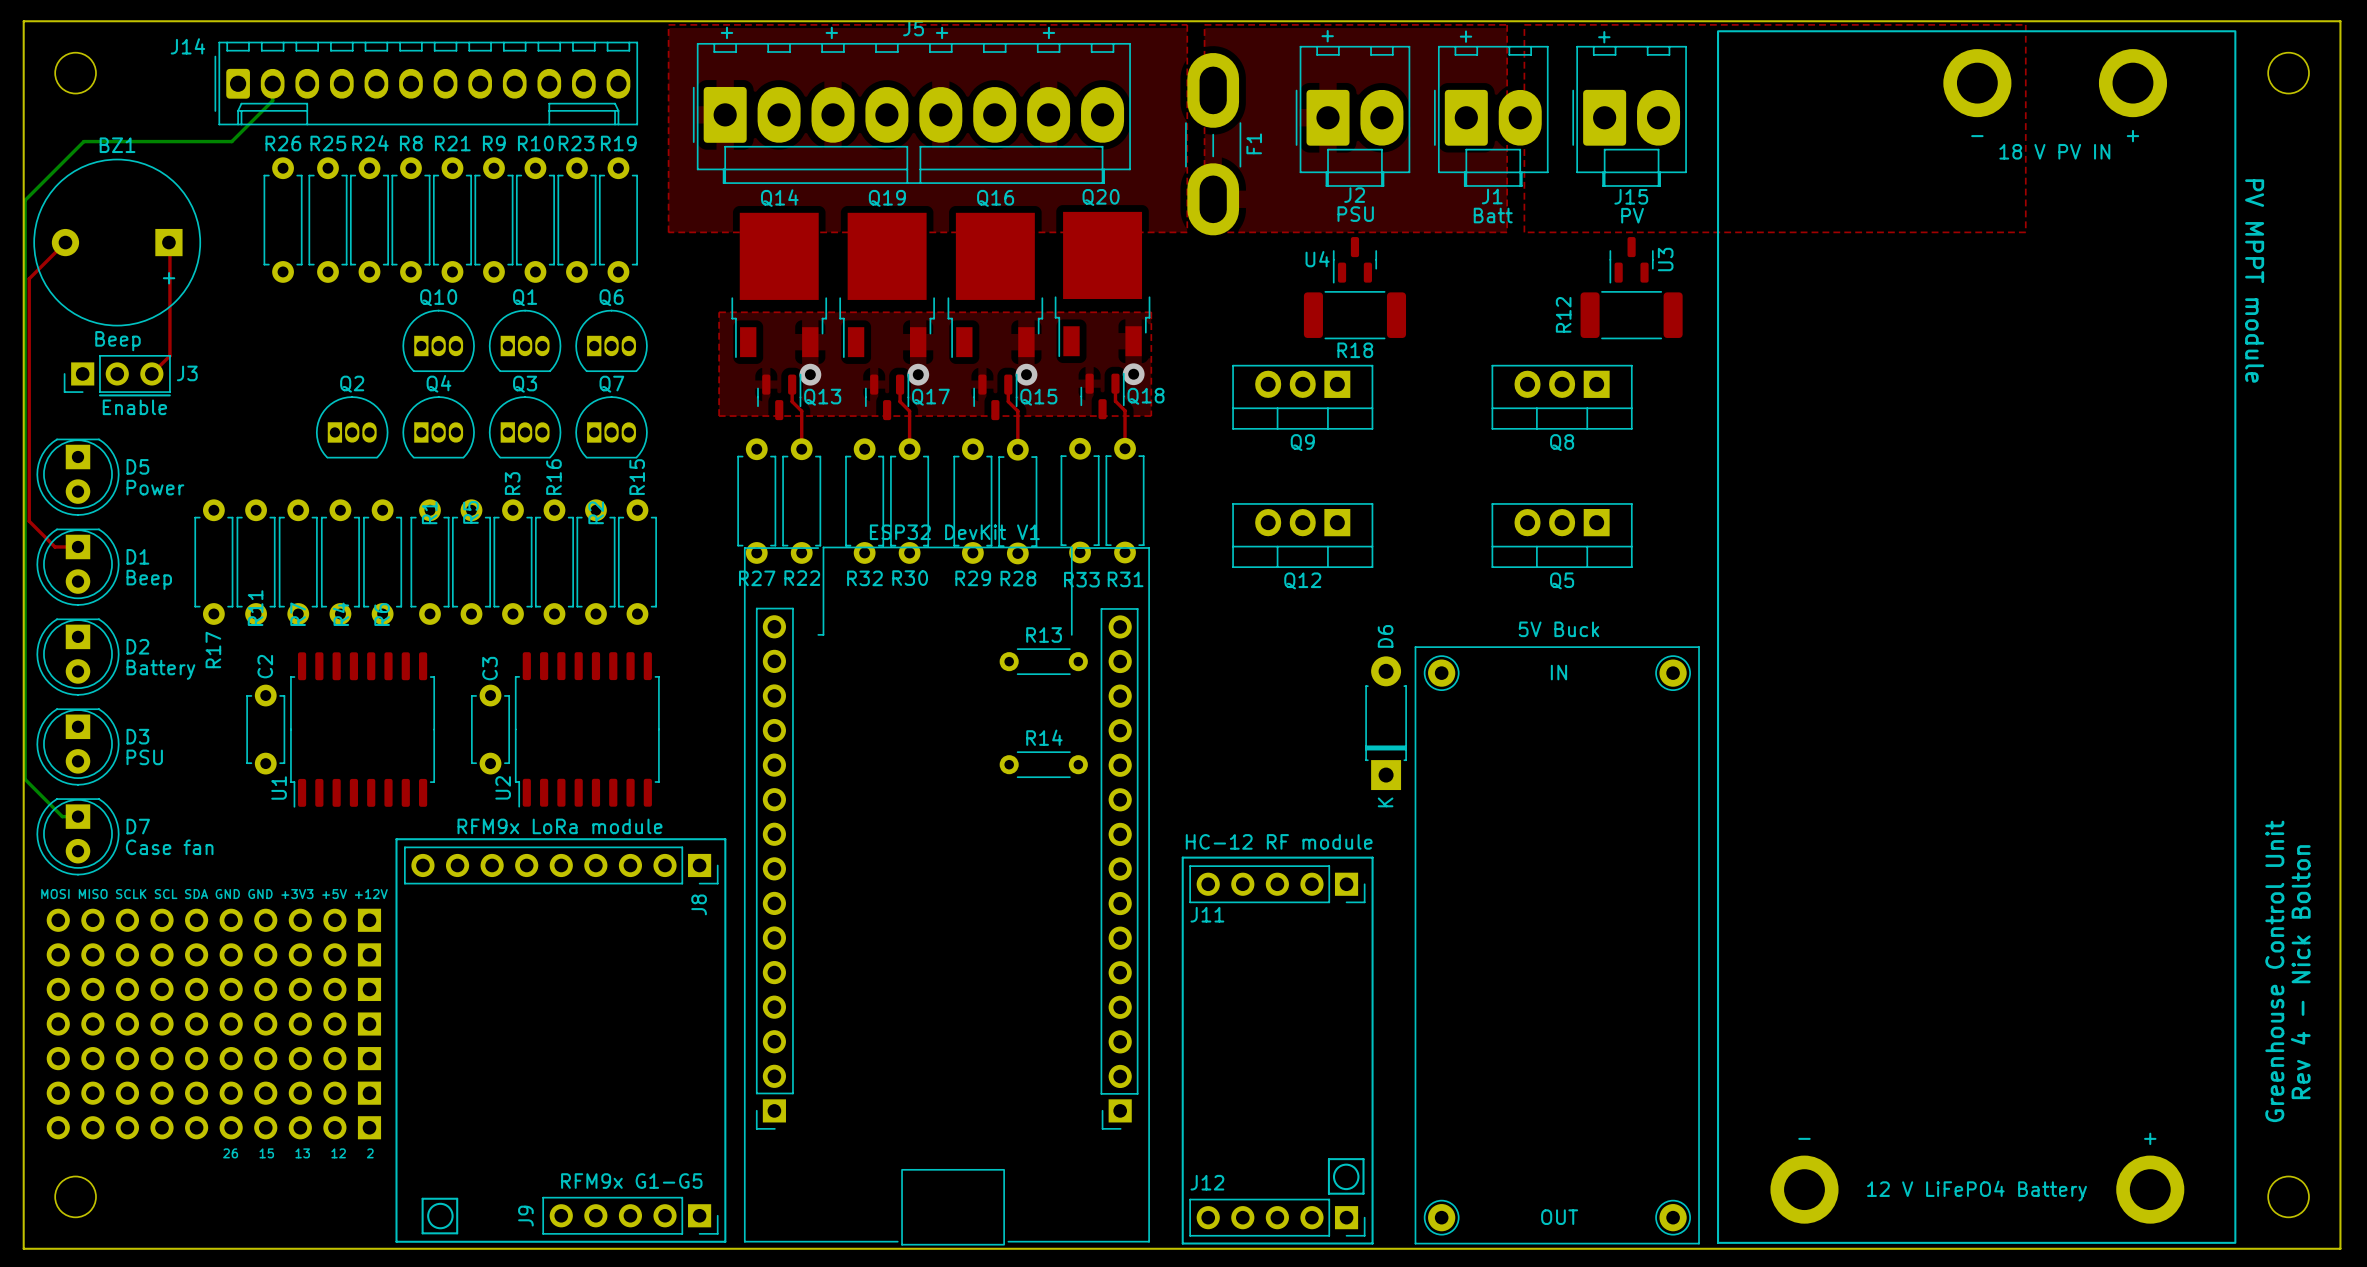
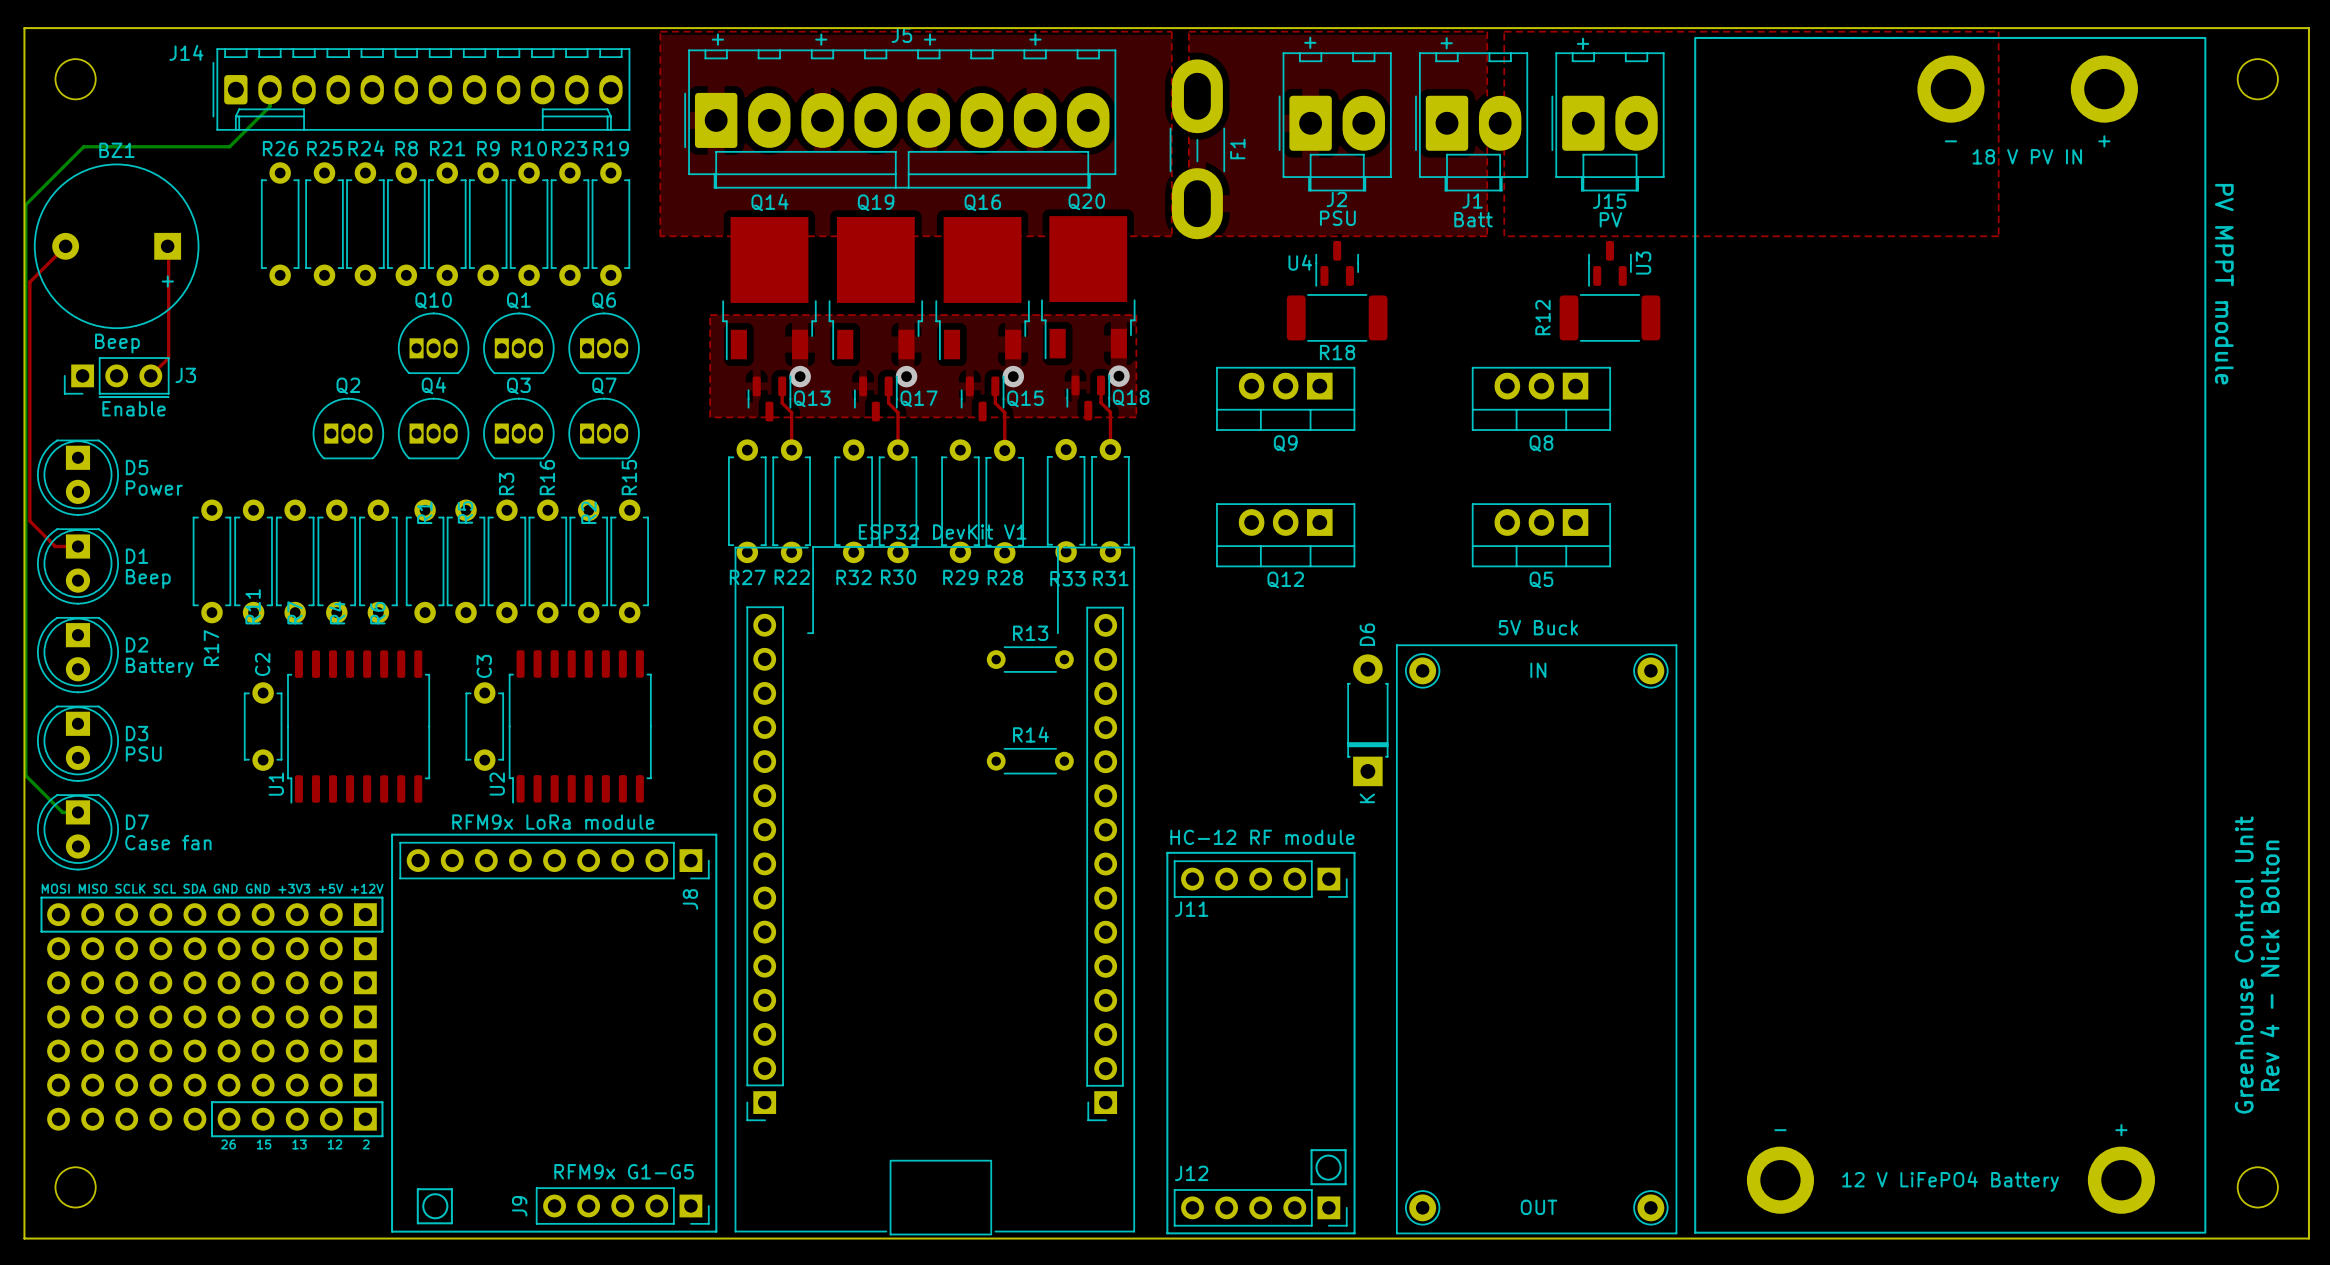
line: none -> (41, 897) (382, 897) (382, 931) (41, 931) (41, 897)
line: none -> (211, 1102) (382, 1102) (382, 1136) (211, 1136) (211, 1102)

